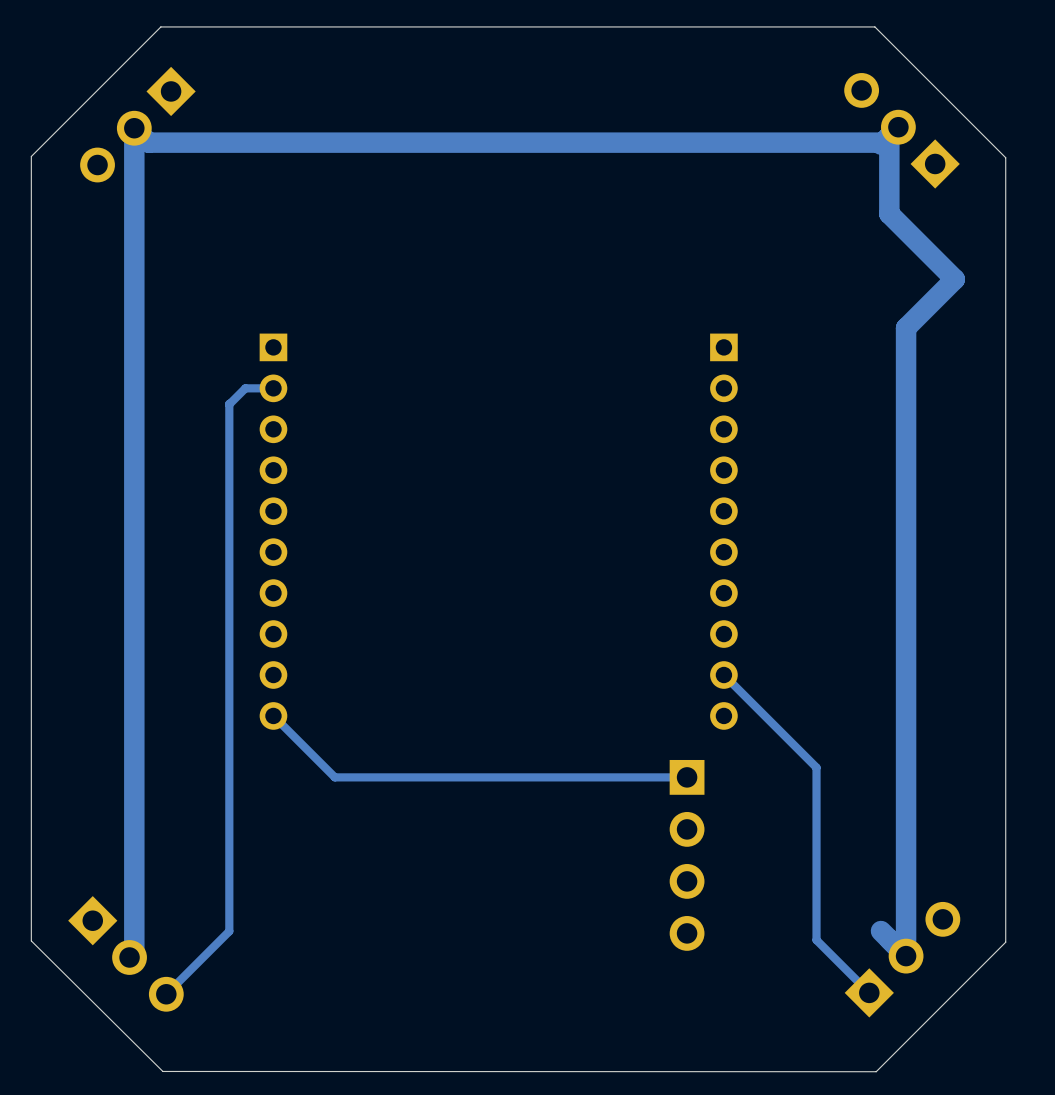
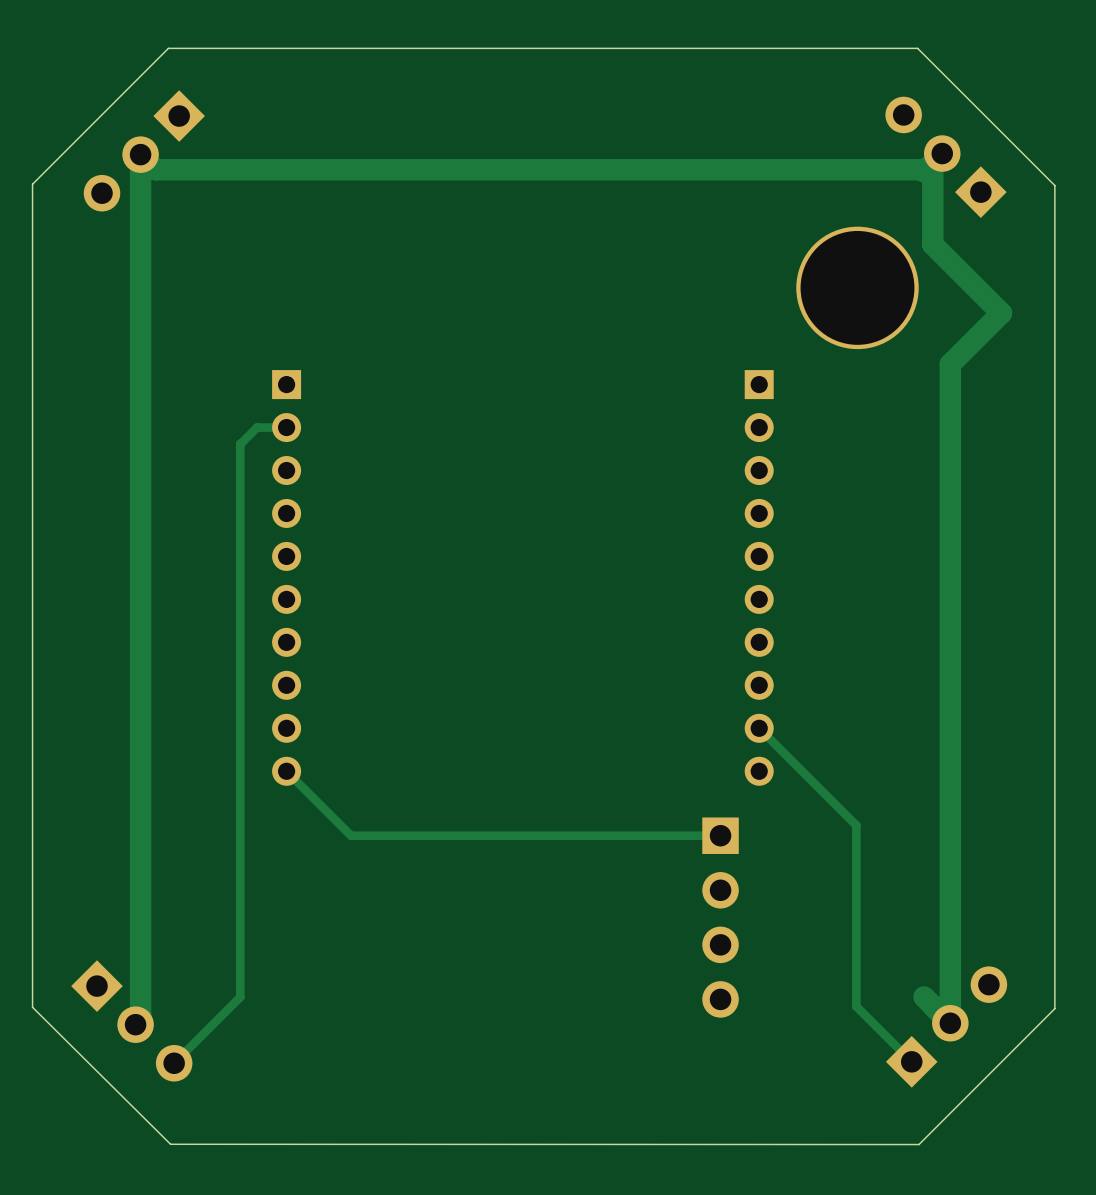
part: none -> (857, 287)

